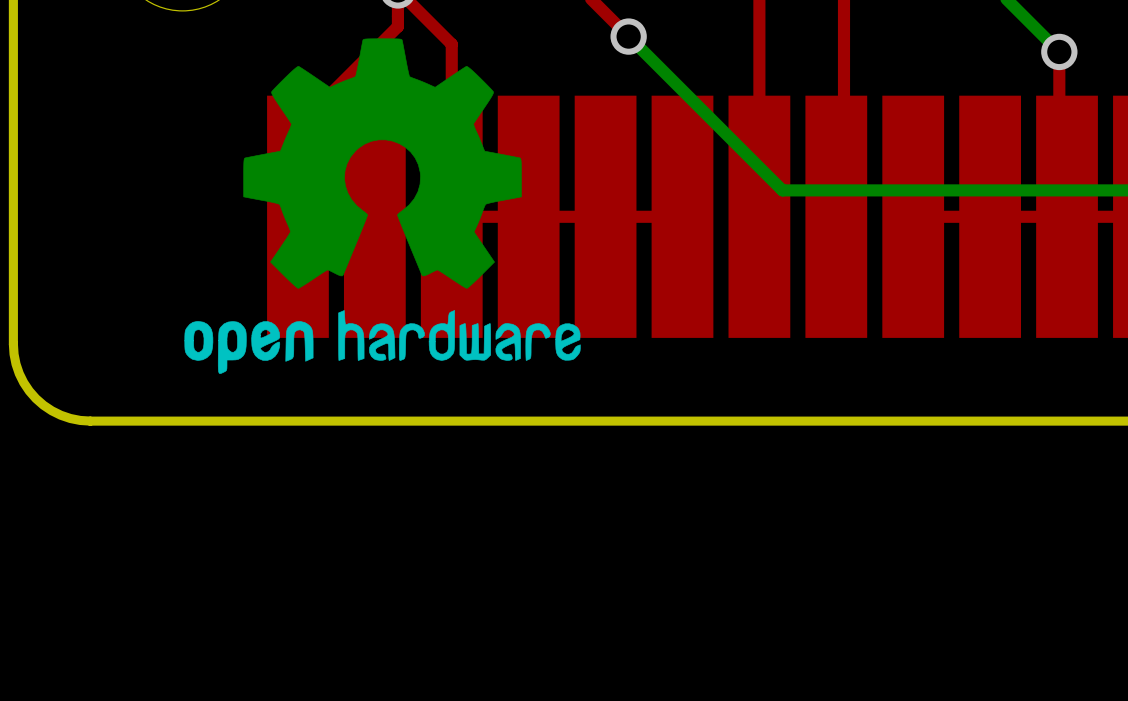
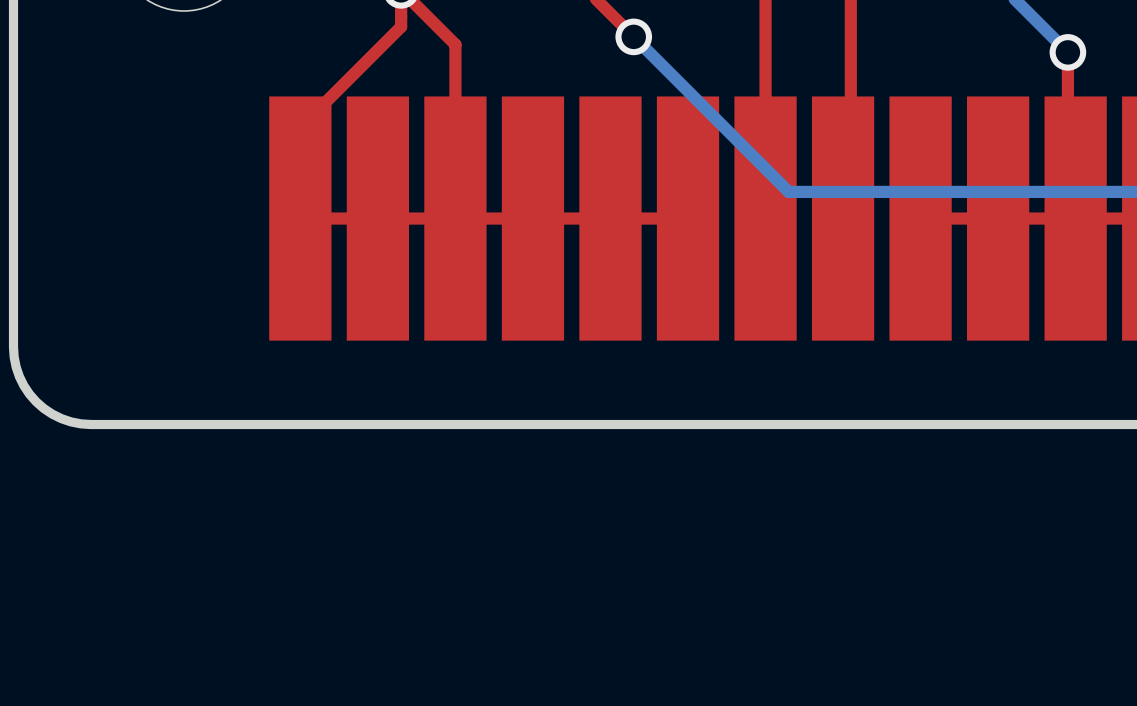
drawing: [184, 38, 581, 374] -> none

